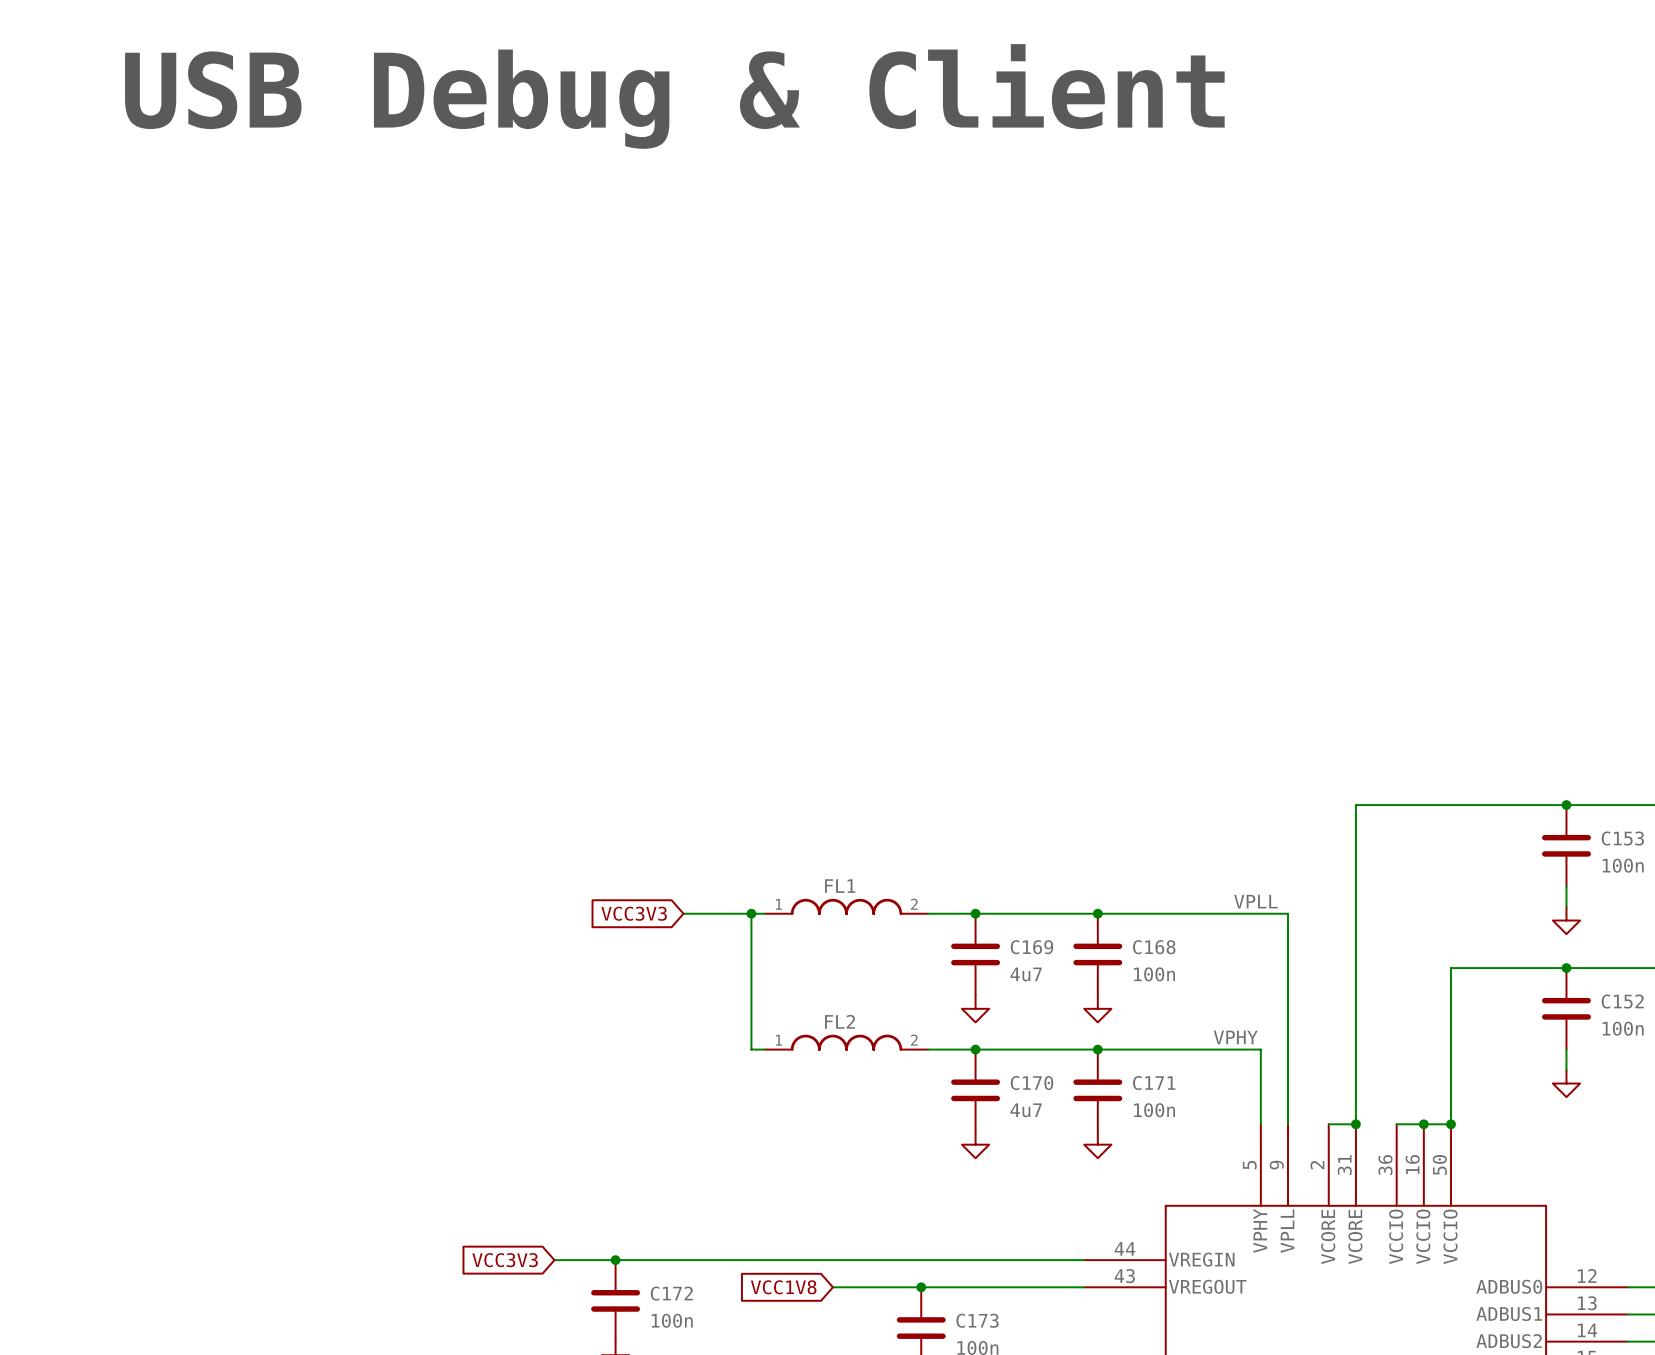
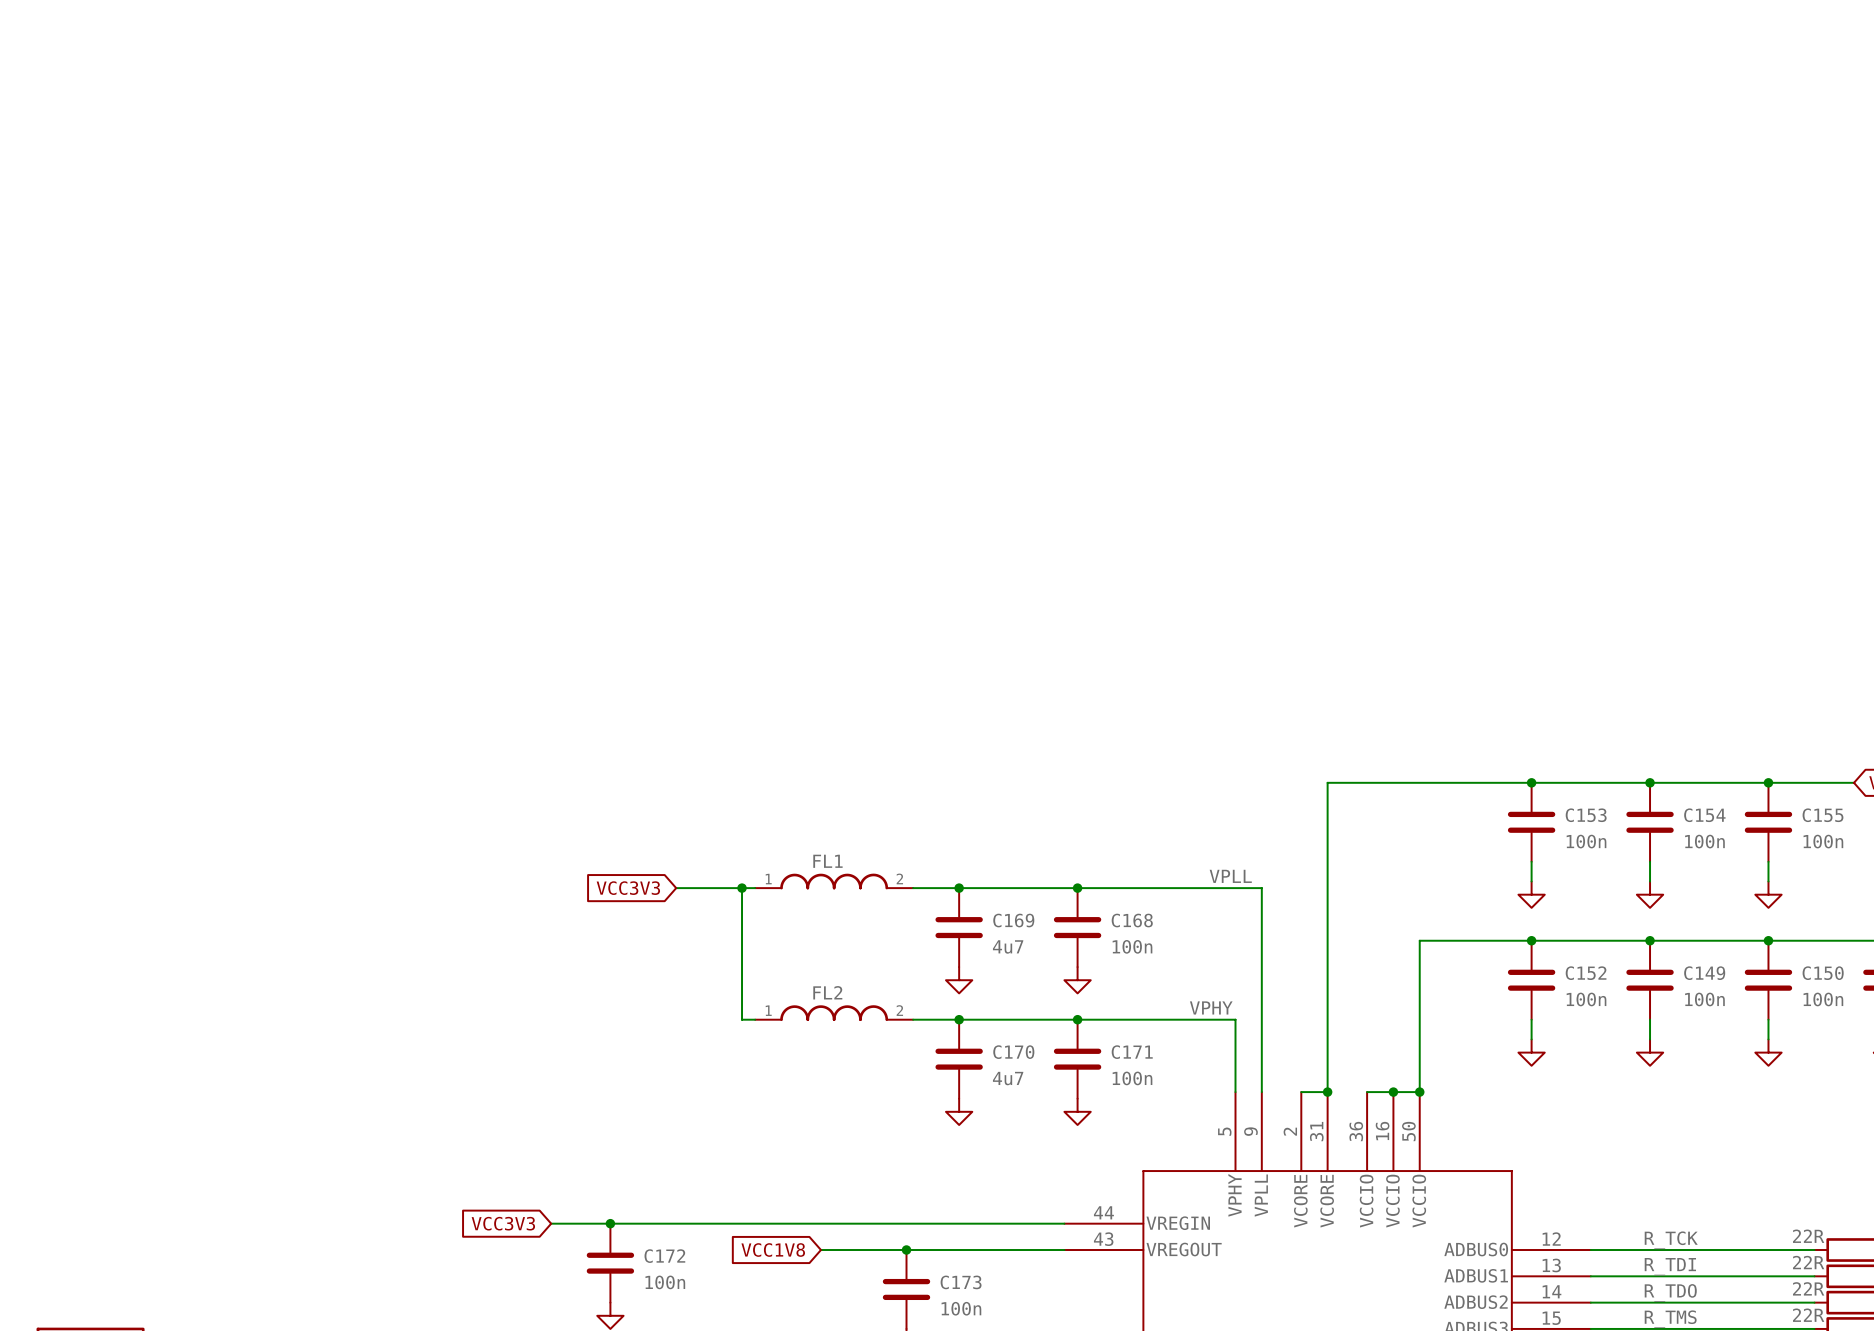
text: USB Debug & Client (674, 96) -> none

